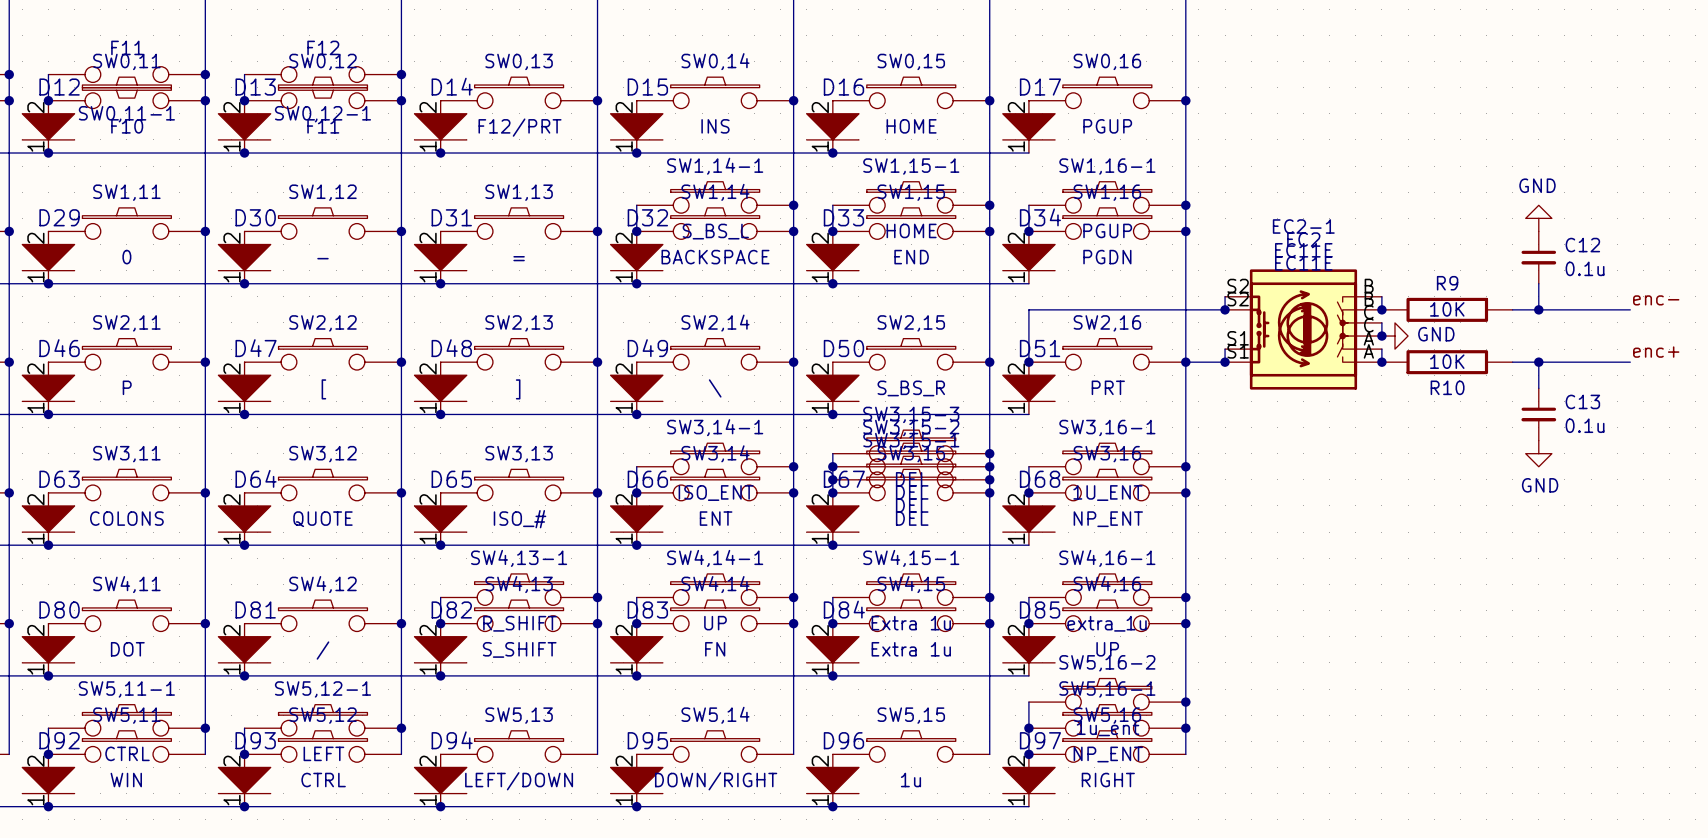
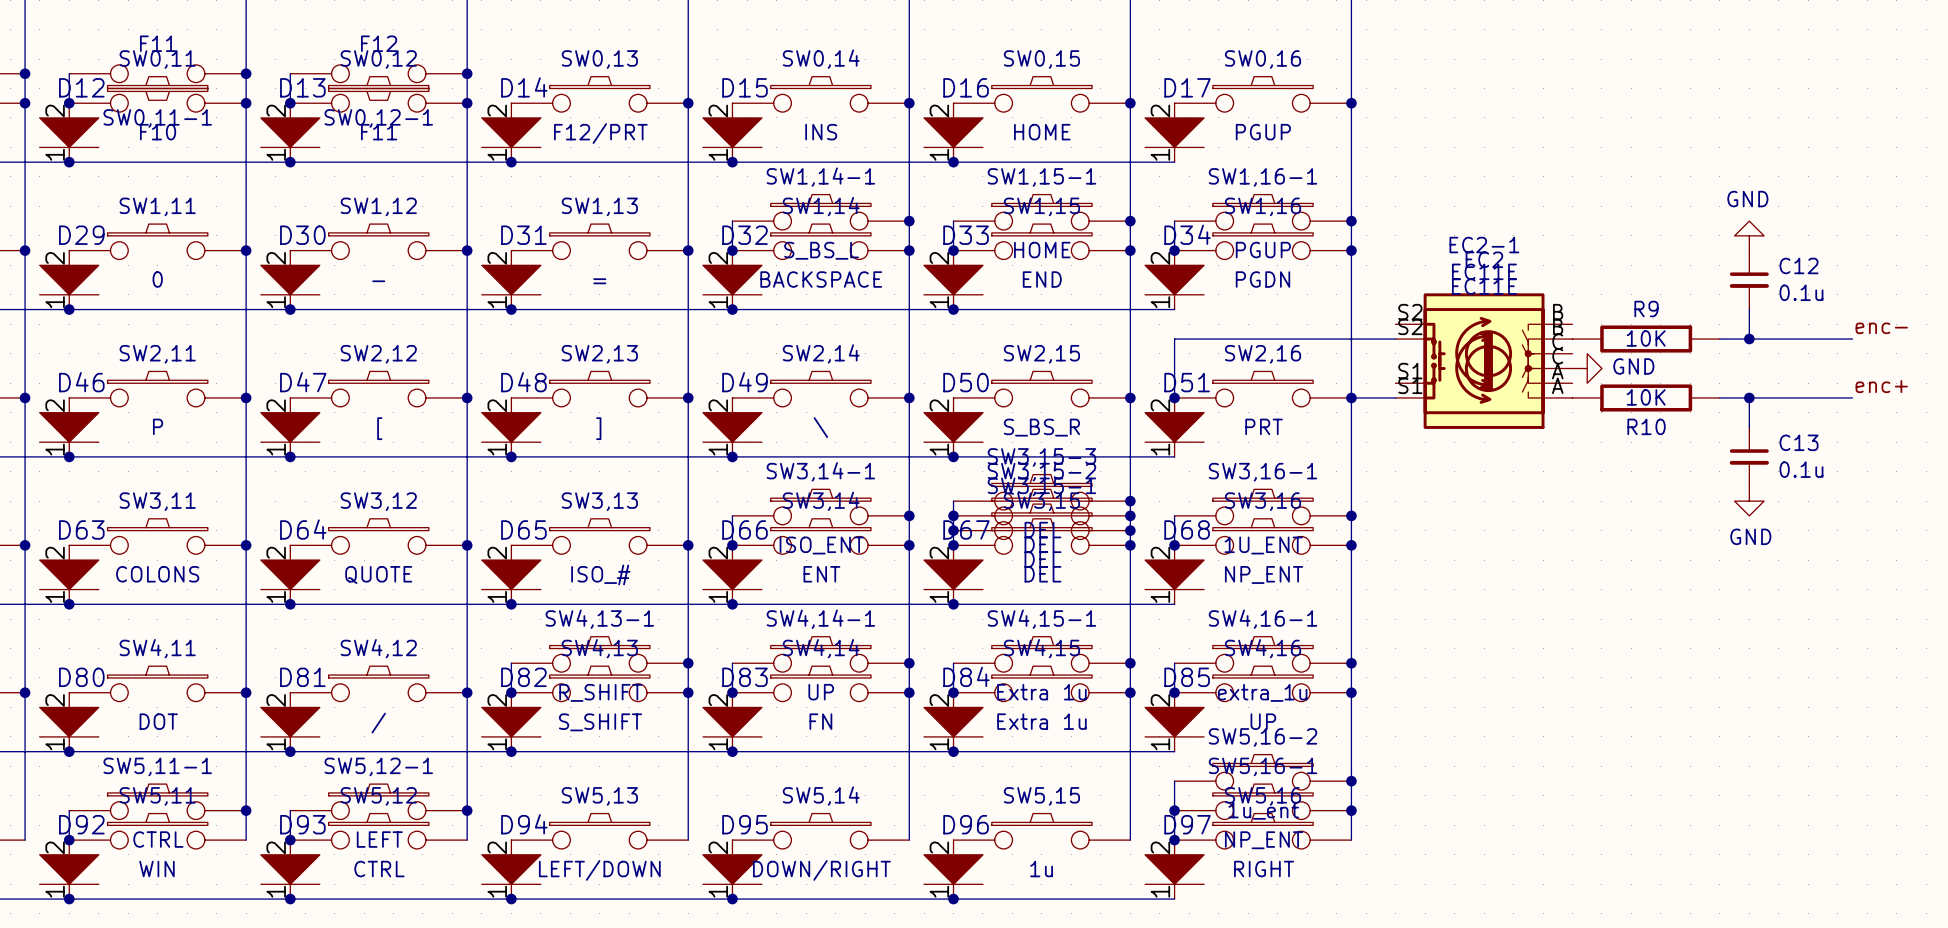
wire: (1225, 296) (1225, 309) -> none
wire: (1381, 296) (1381, 309) -> none
junction: (1225, 309) -> none
junction: (1381, 309) -> none
wire: (1381, 322) (1381, 336) -> none
junction: (1381, 336) -> none
wire: (1225, 349) (1225, 362) -> none
wire: (1381, 349) (1381, 362) -> none
junction: (1225, 362) -> none
junction: (1381, 362) -> none

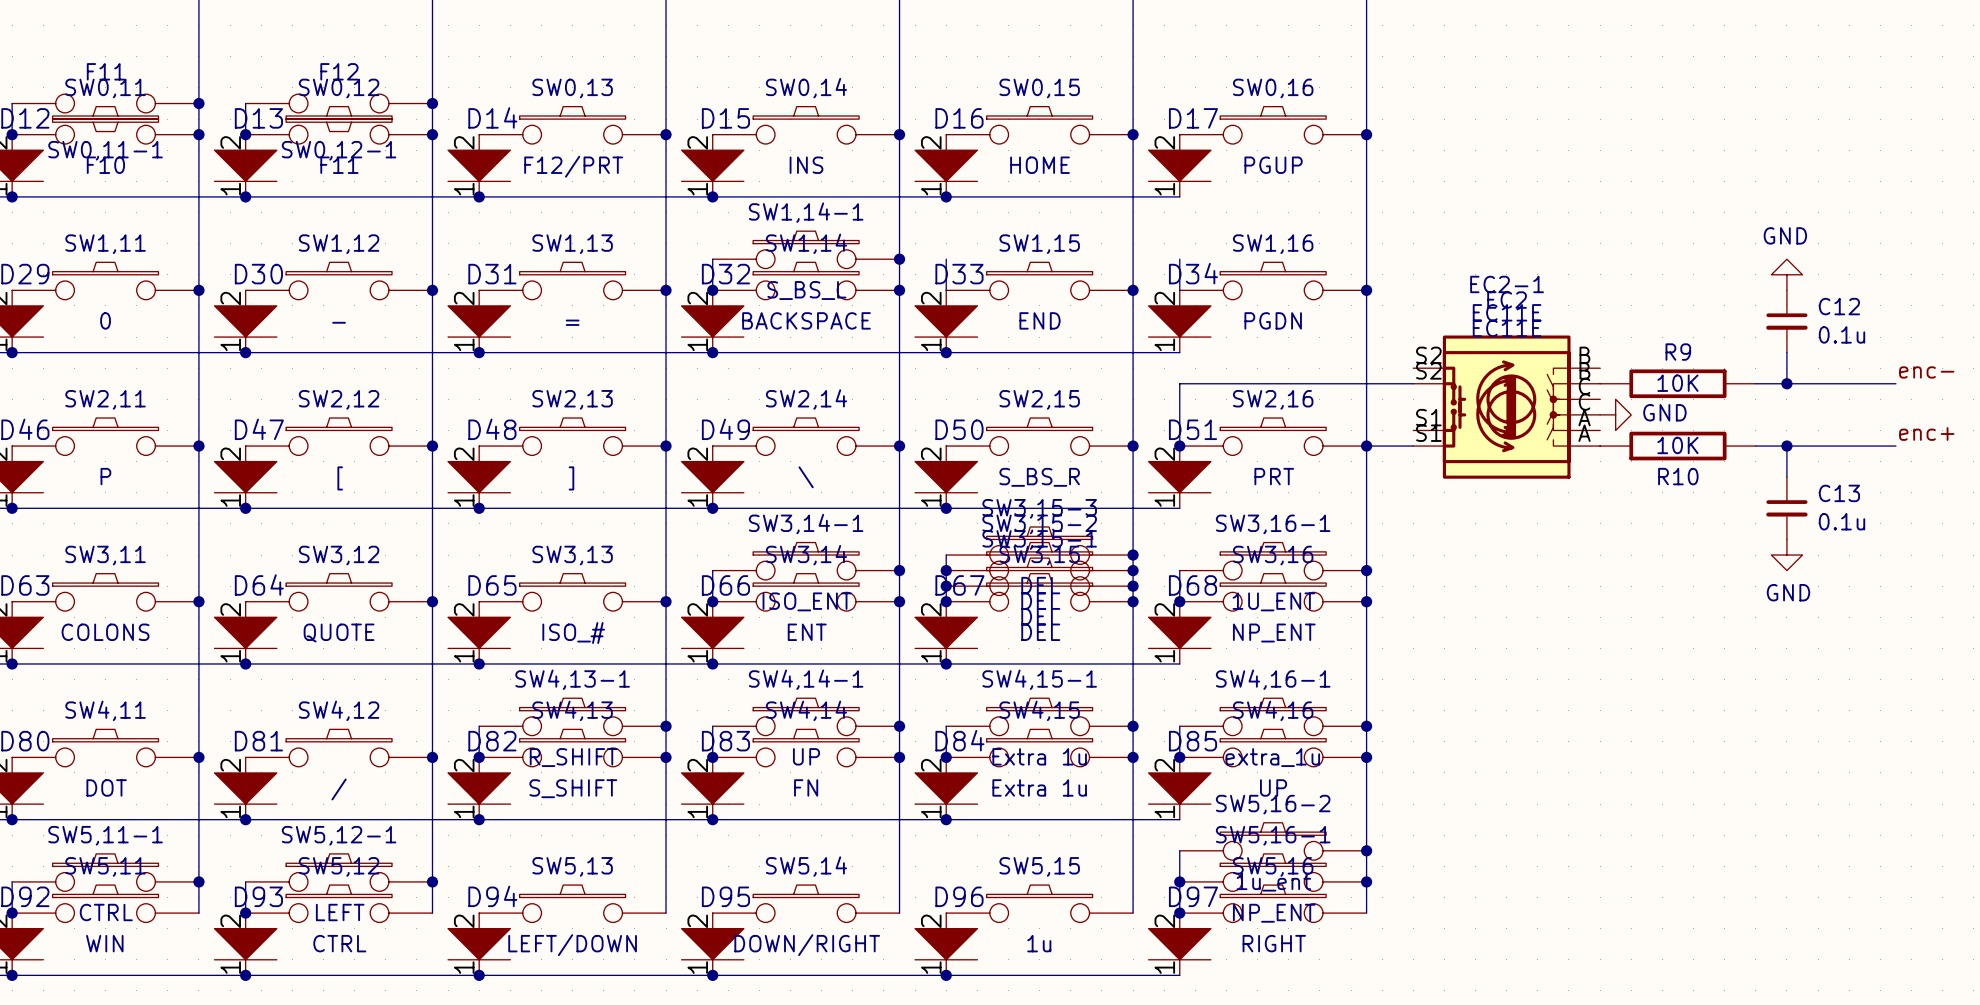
SW1,15-1: HOME (1041, 212) -> none
SW1,16-1: PGUP (1263, 212) -> none
junction: (1130, 221) -> none
junction: (1351, 221) -> none
junction: (953, 250) -> none
junction: (1174, 250) -> none

